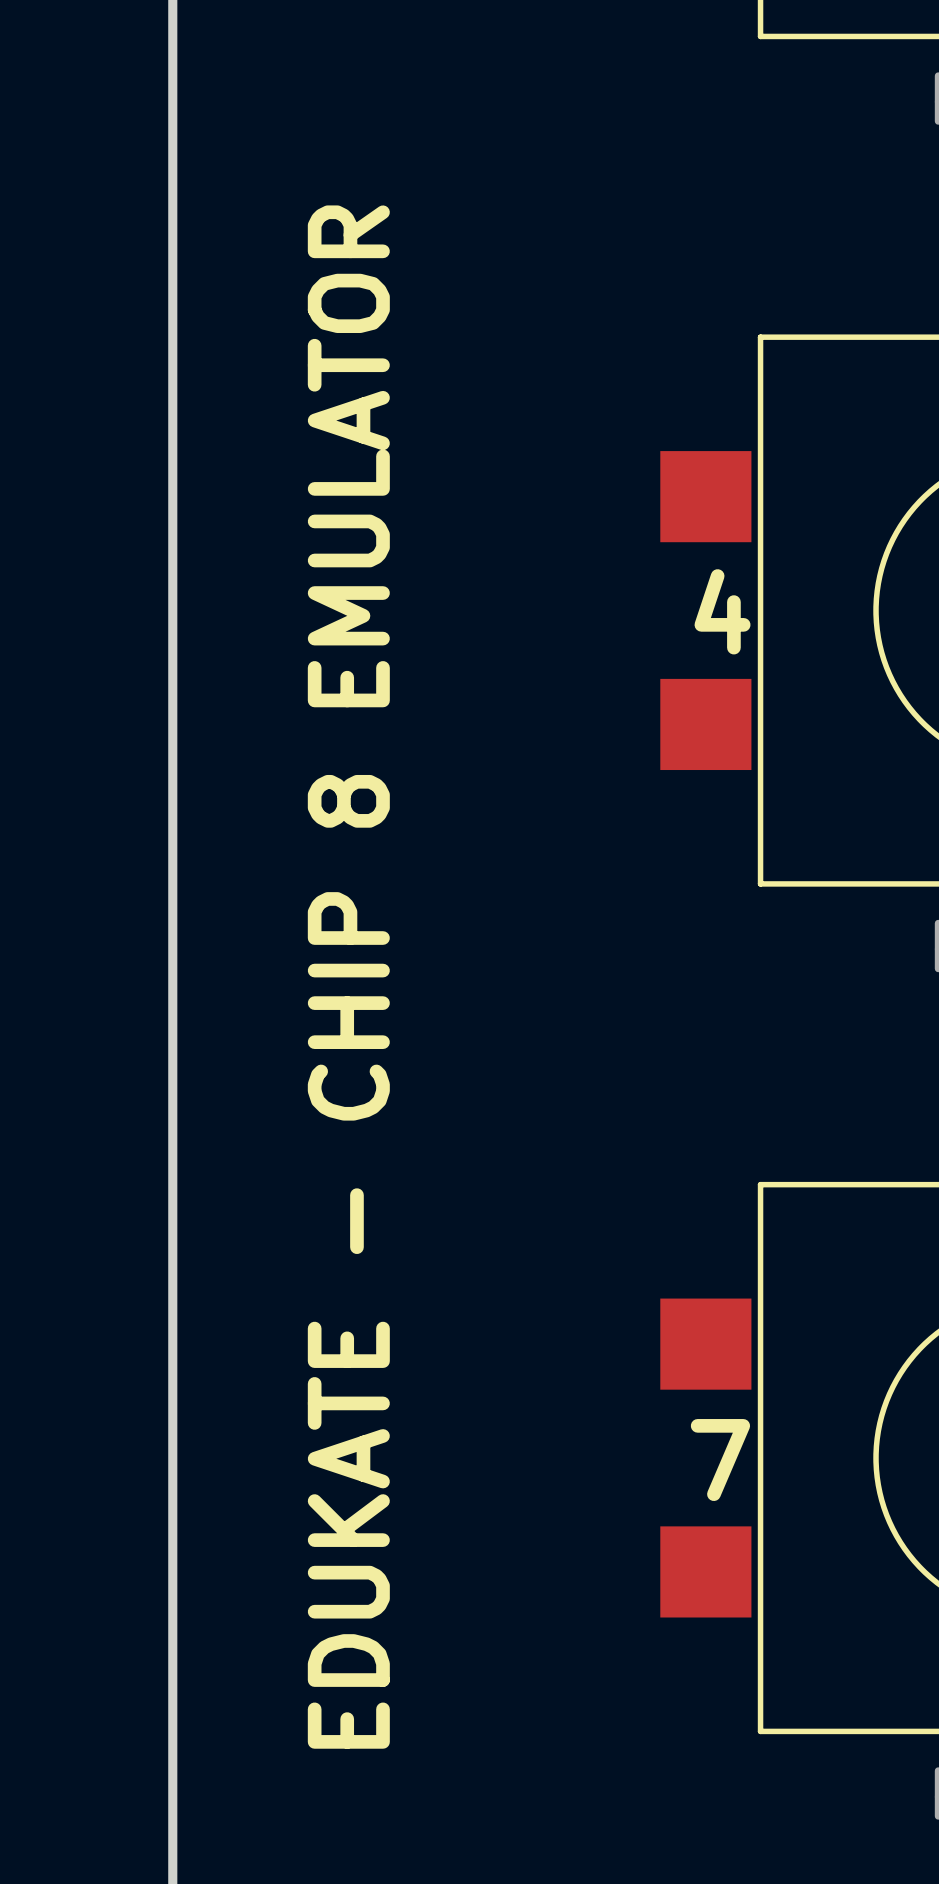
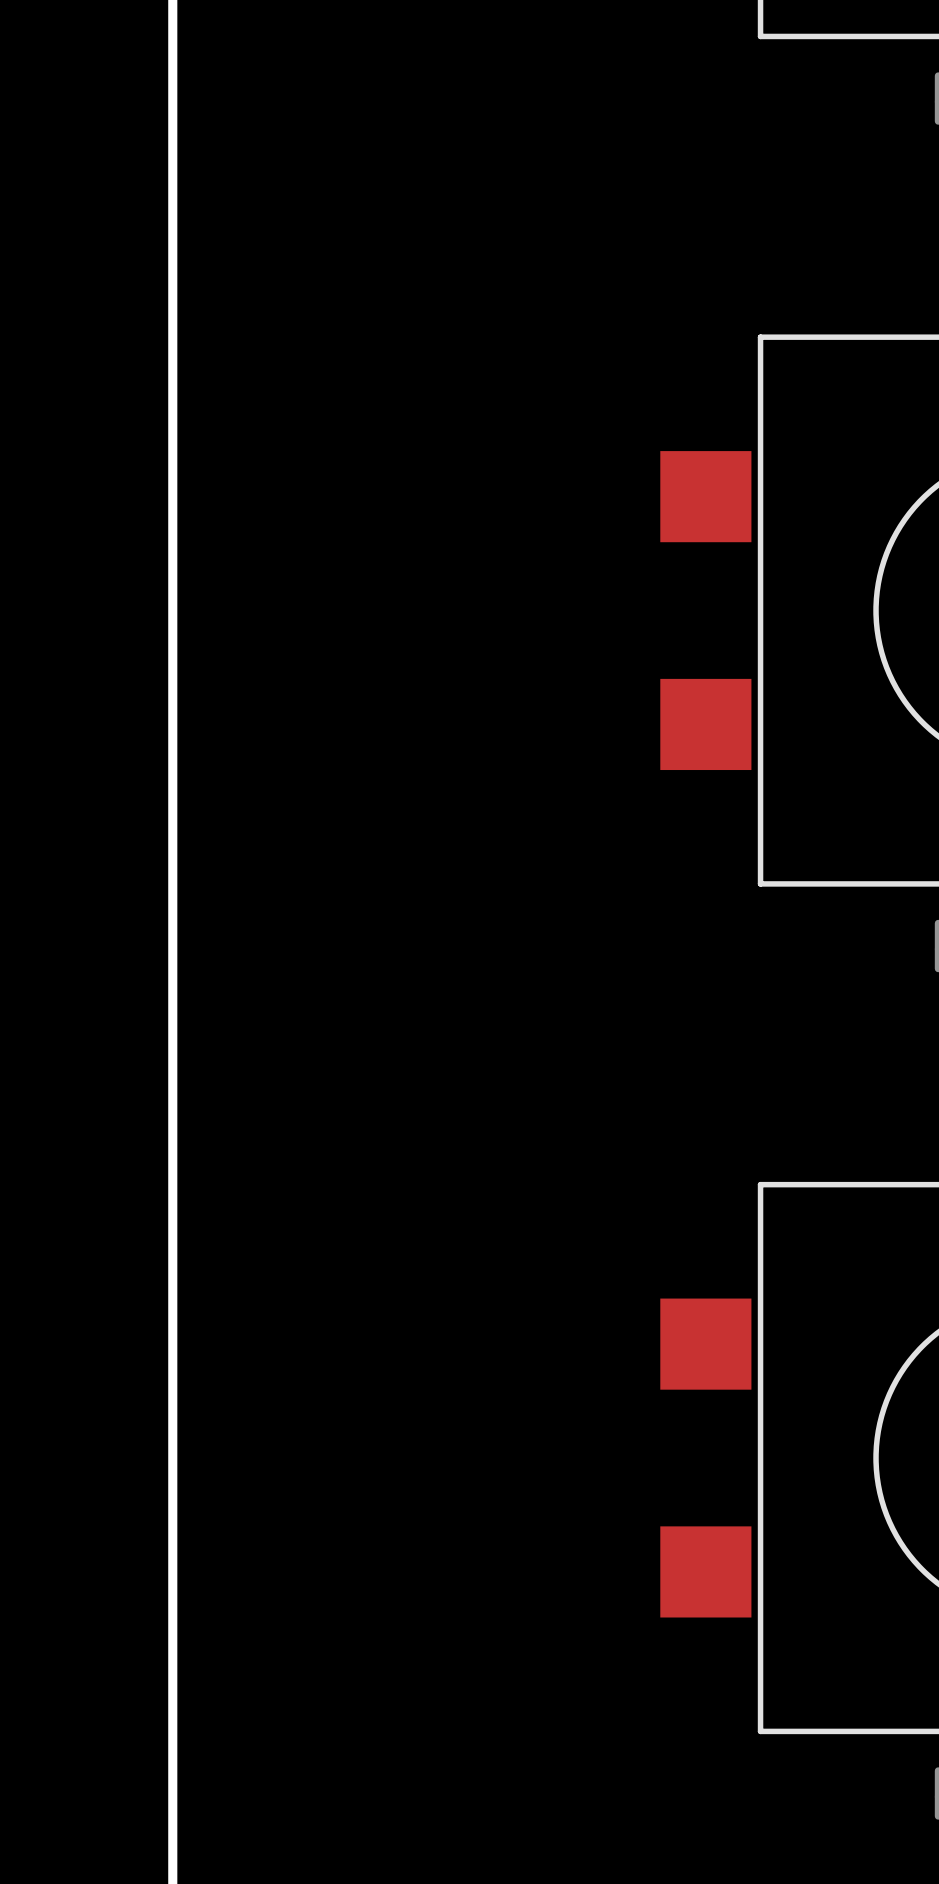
text: 4 (722, 611) -> none
text: EDUKATE - CHIP 8 EMULATOR (348, 977) -> none
text: 7 (720, 1460) -> none

